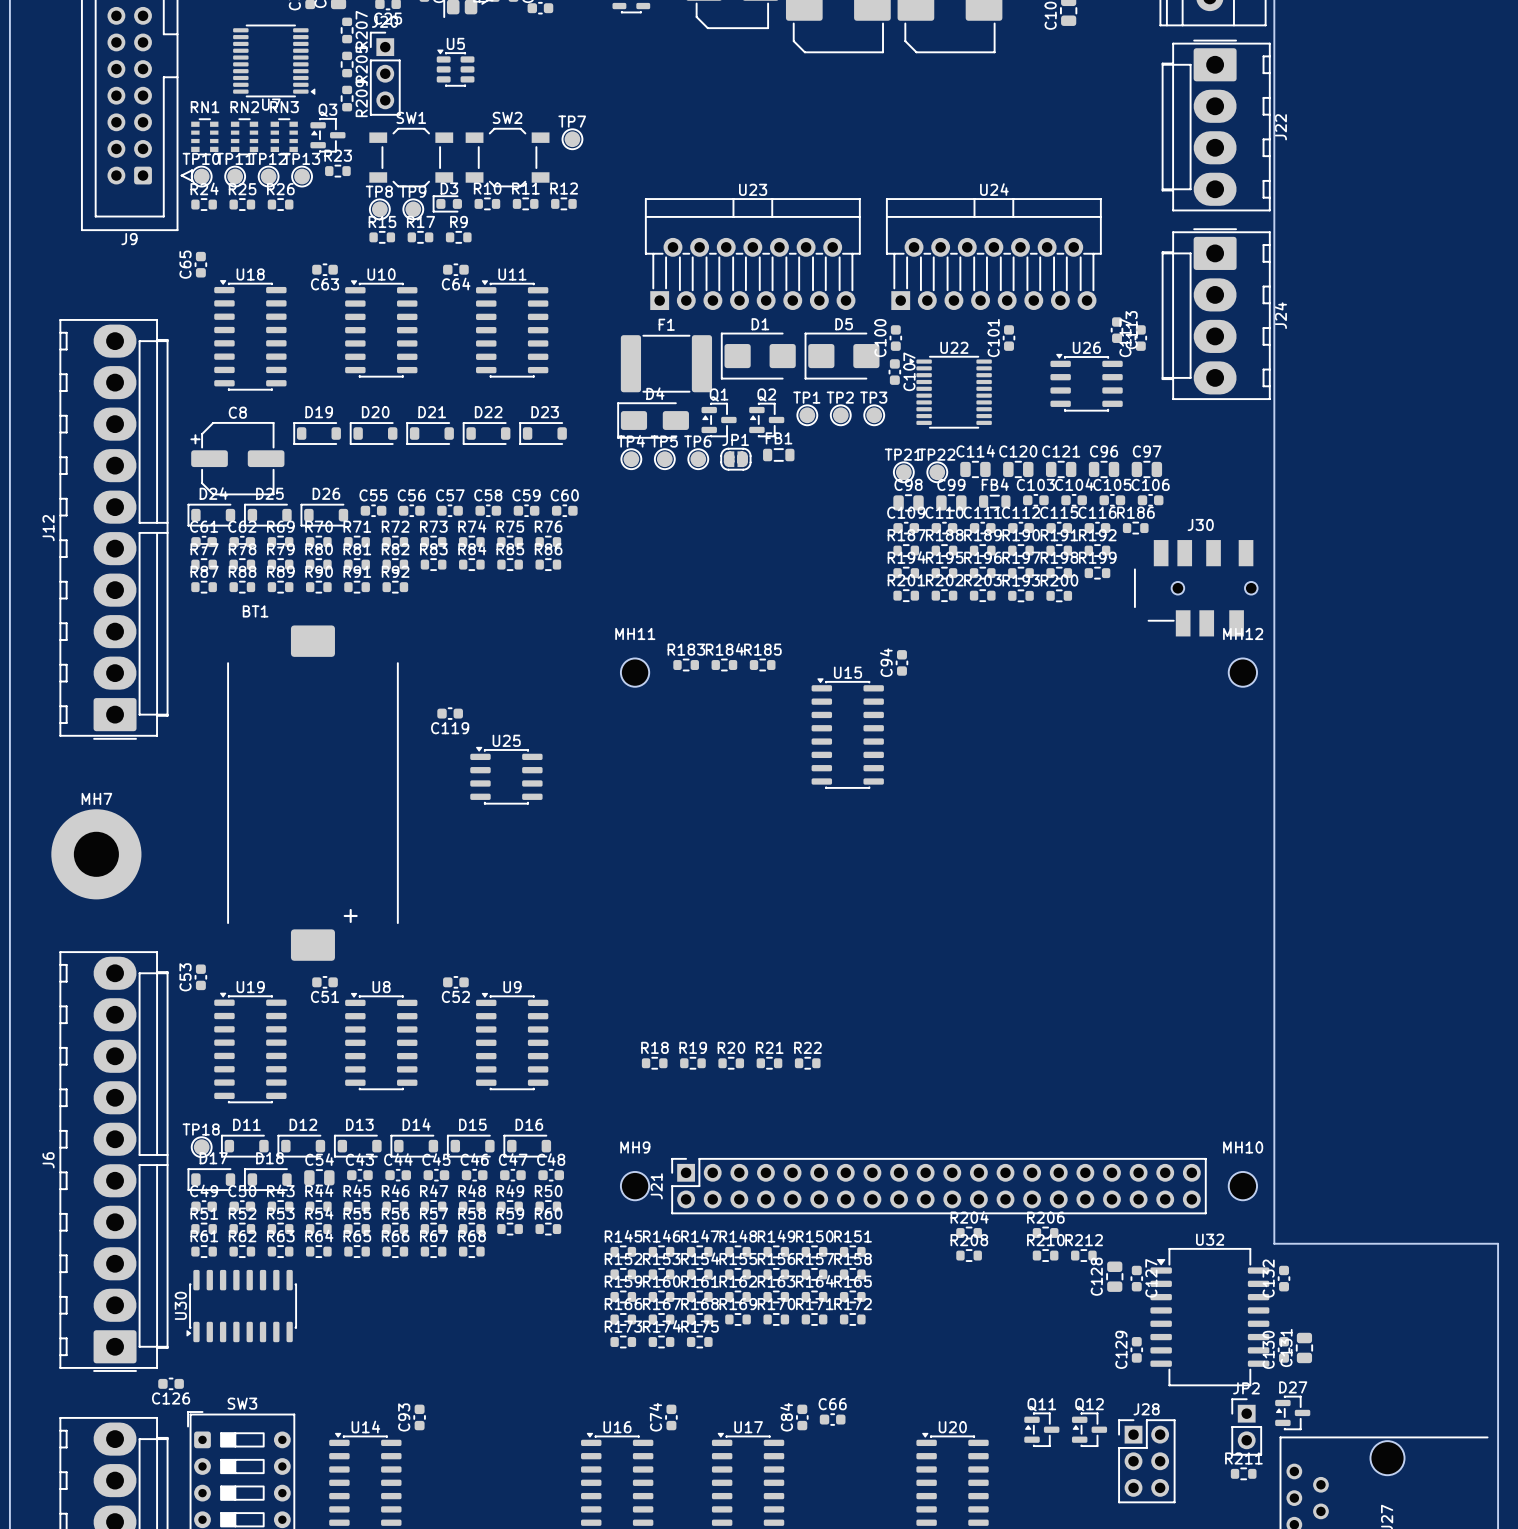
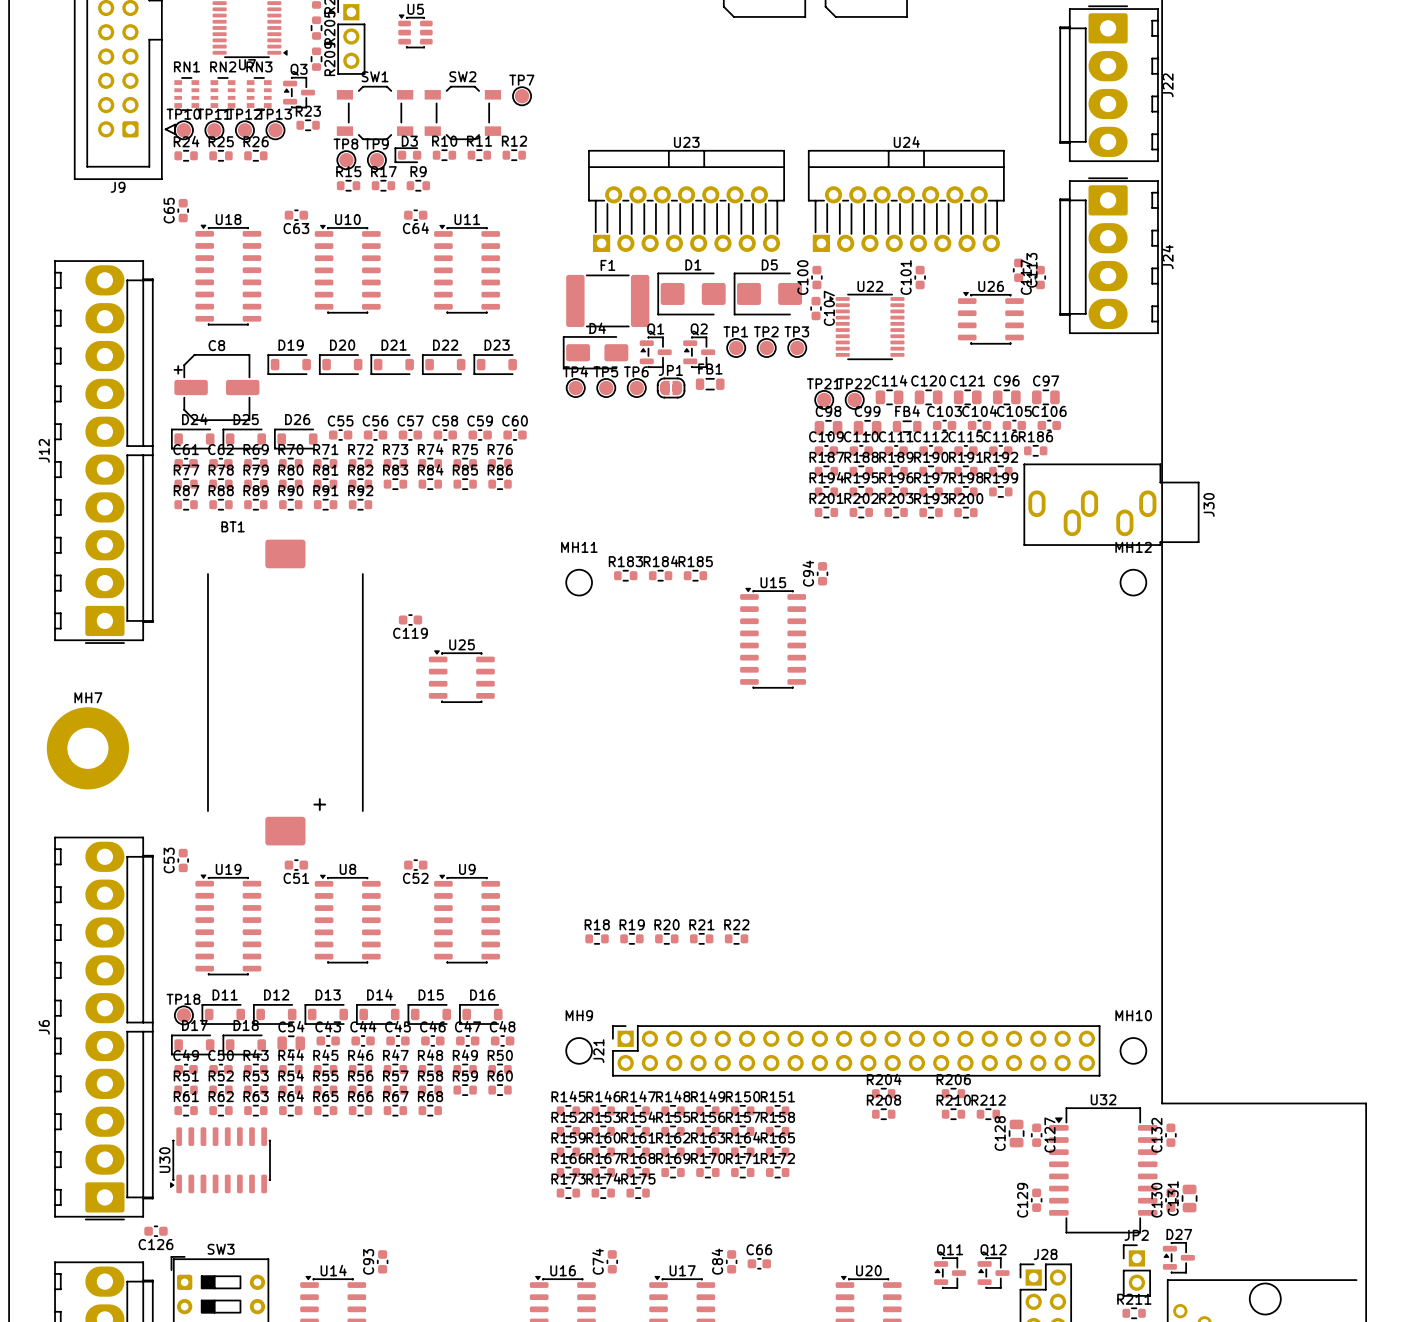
J30 name position: J30 (1200, 524) -> J30 (1209, 504)
J30 footprint: [1134, 540, 1258, 637] -> [1023, 463, 1200, 546]

